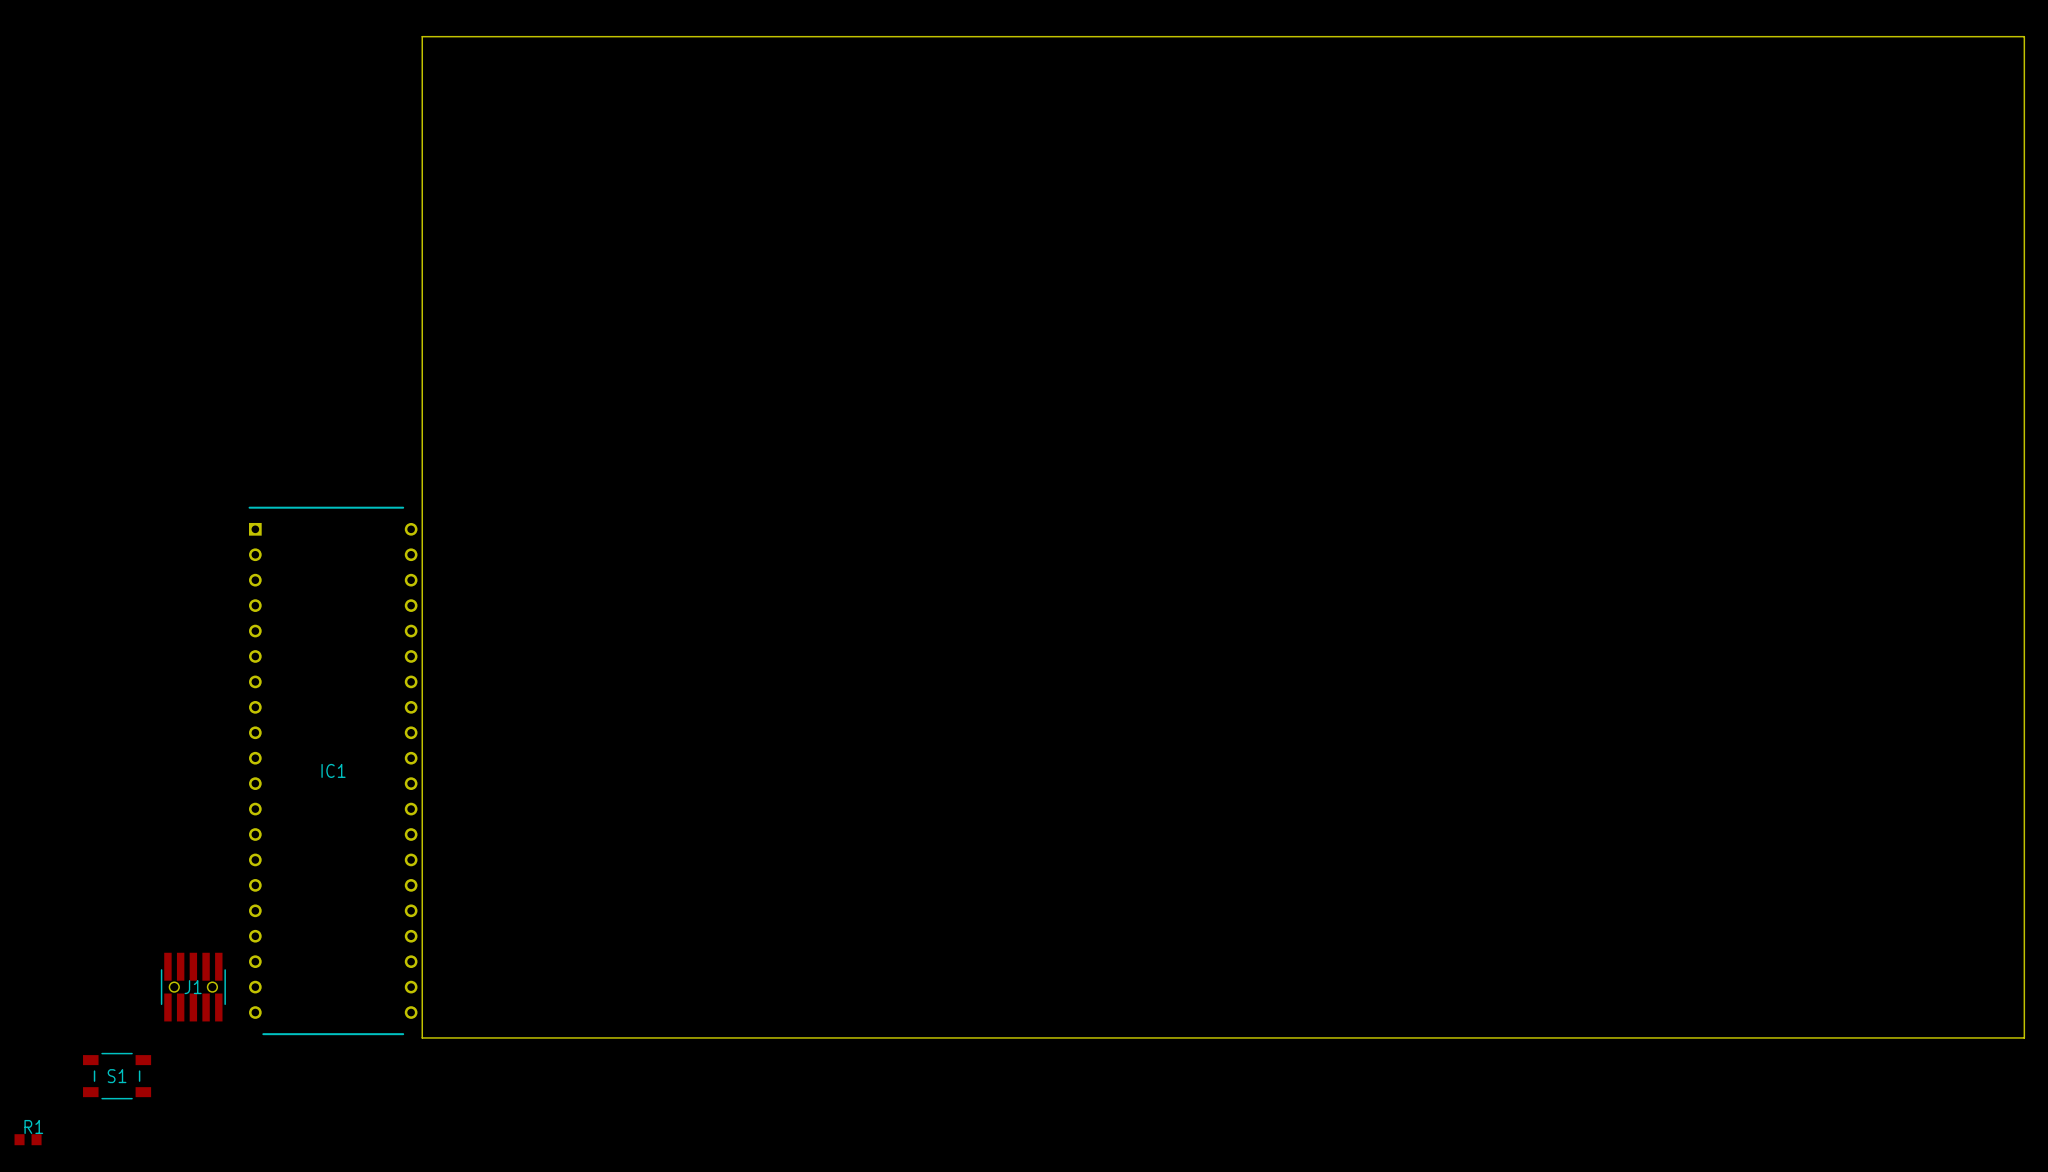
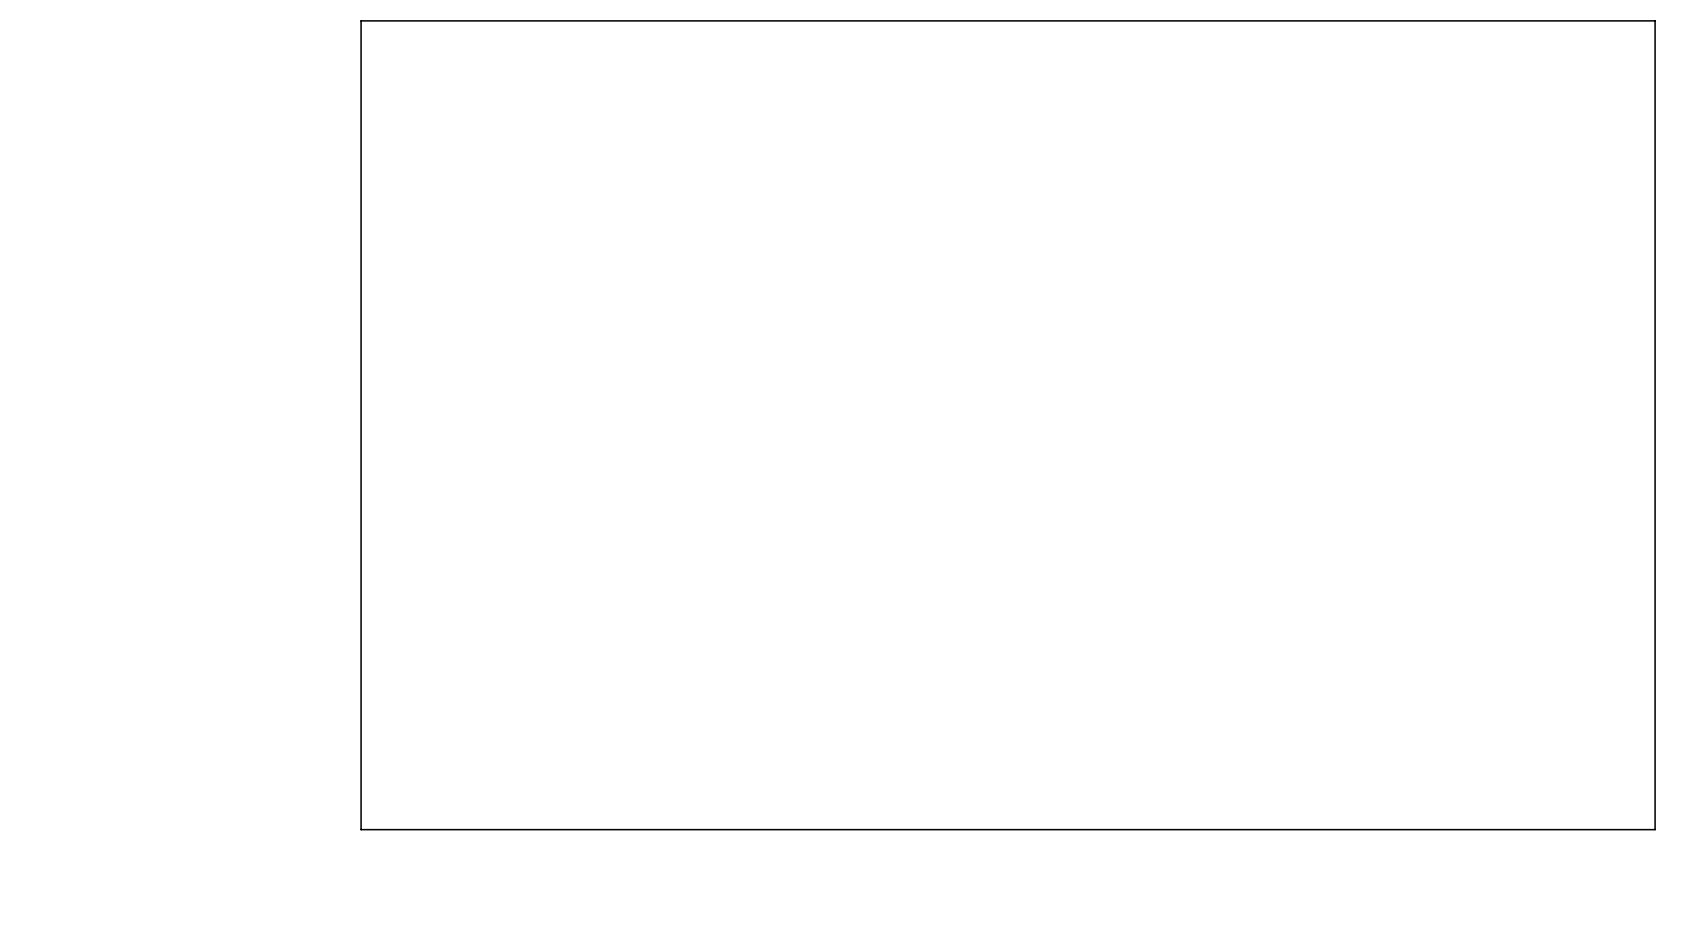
IC1: (333, 770) -> none
J1: (193, 987) -> none
S1: (117, 1076) -> none
R1: (28, 1139) -> none

